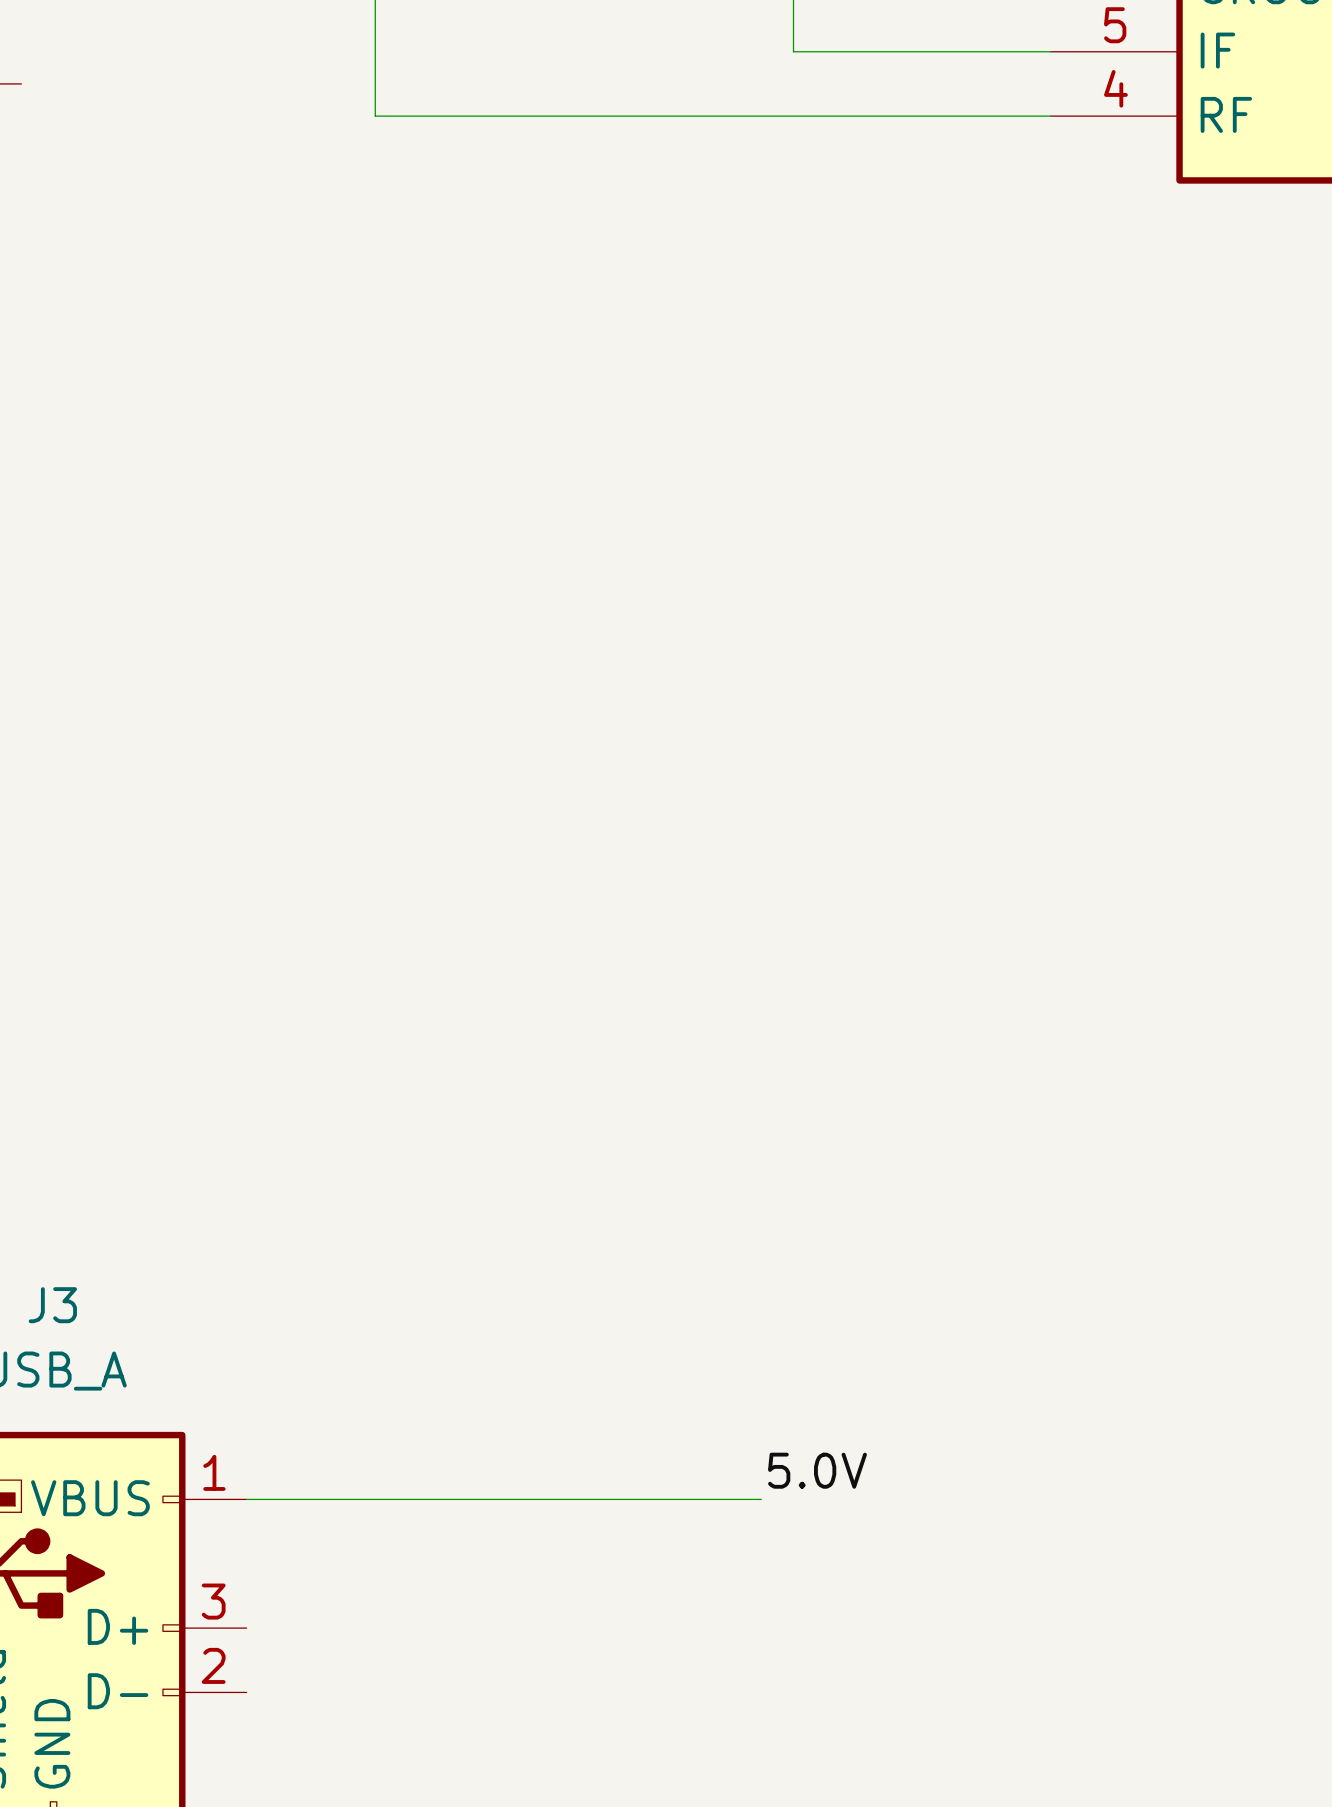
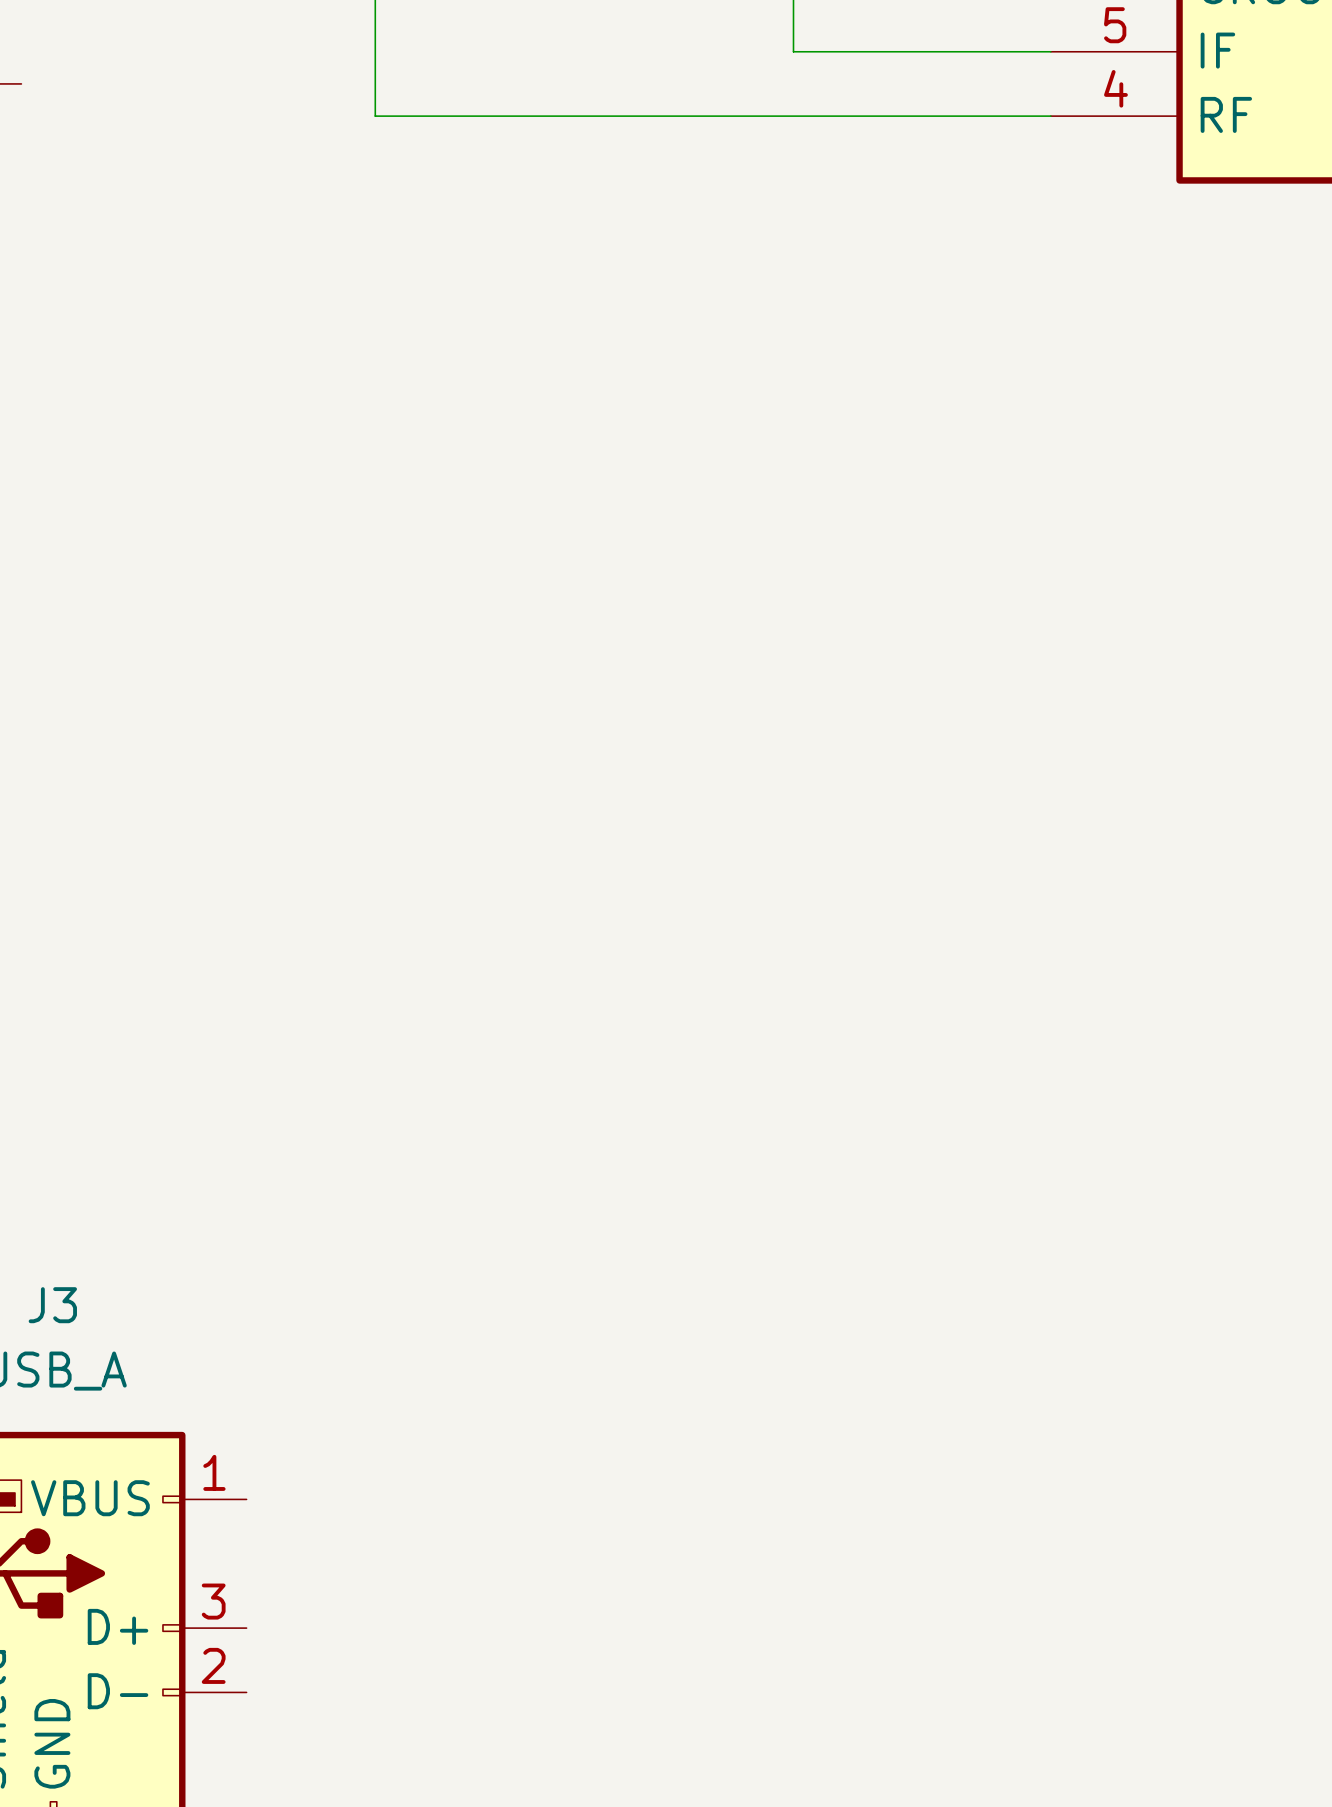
label: 5.0V (817, 1470) -> none
wire: (246, 1499) (761, 1499) -> none

